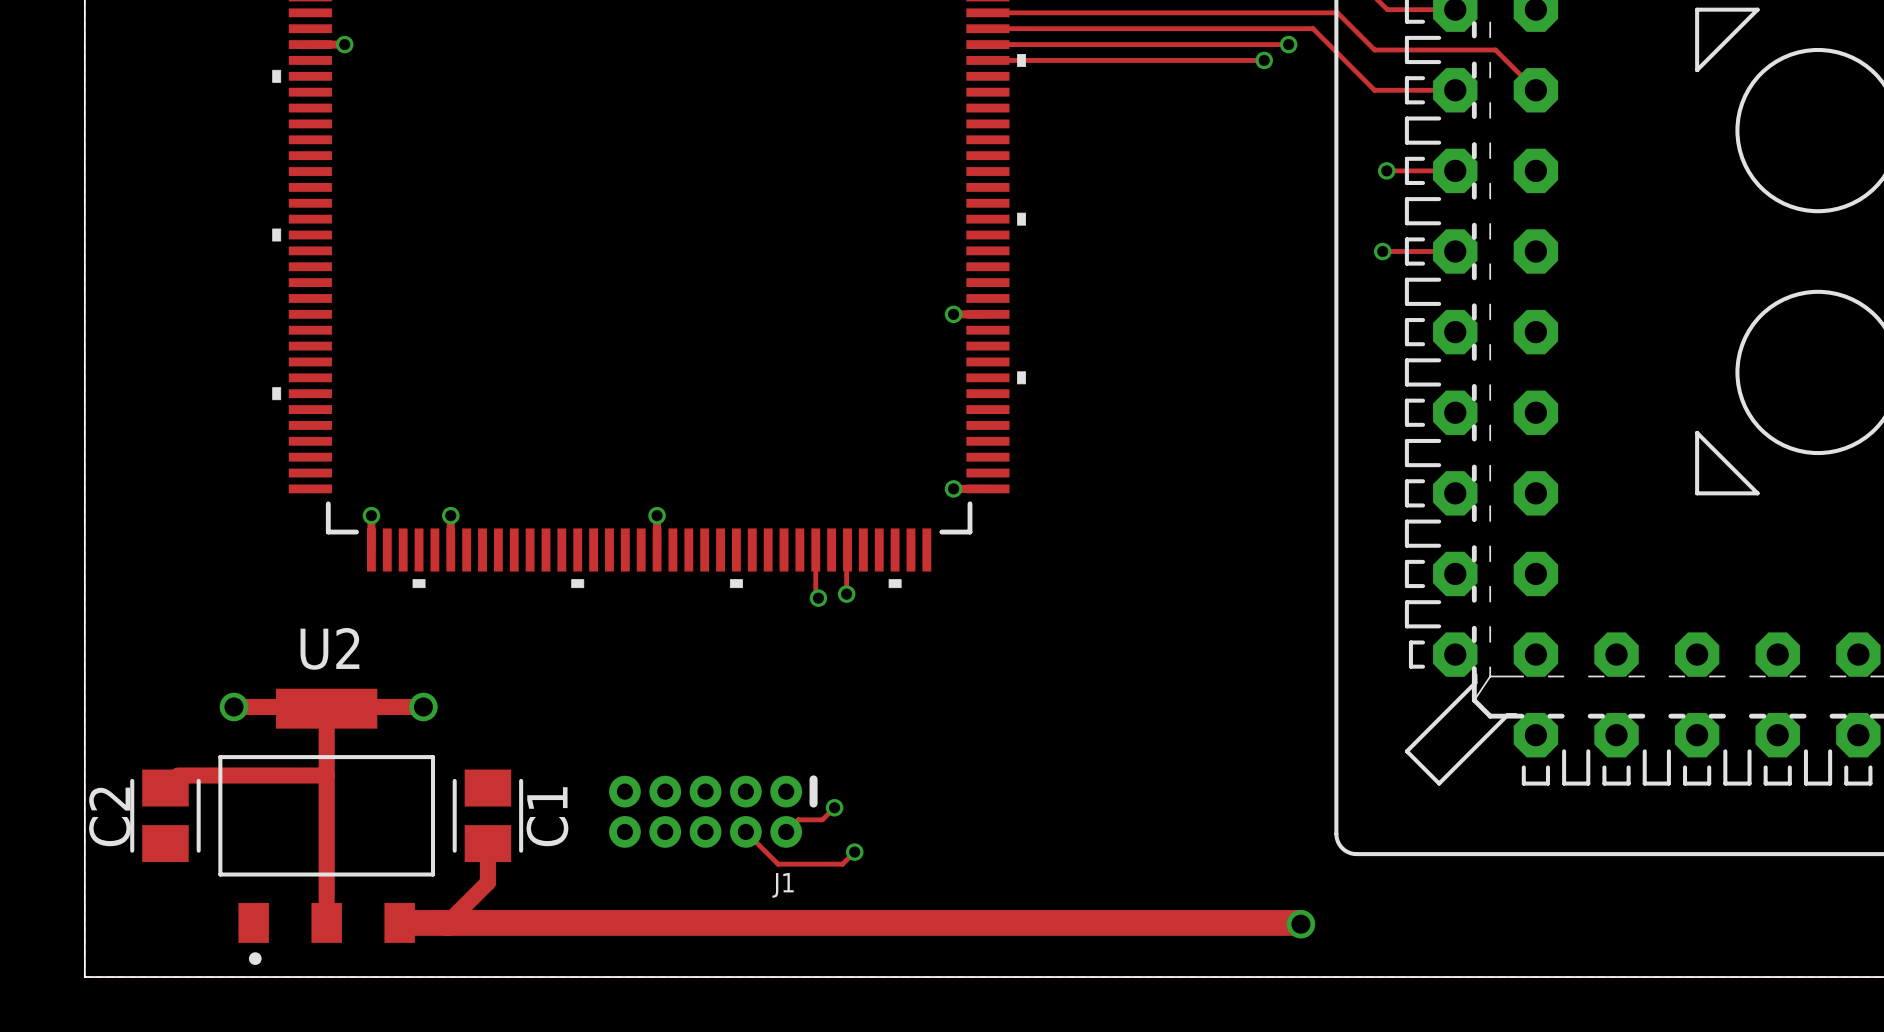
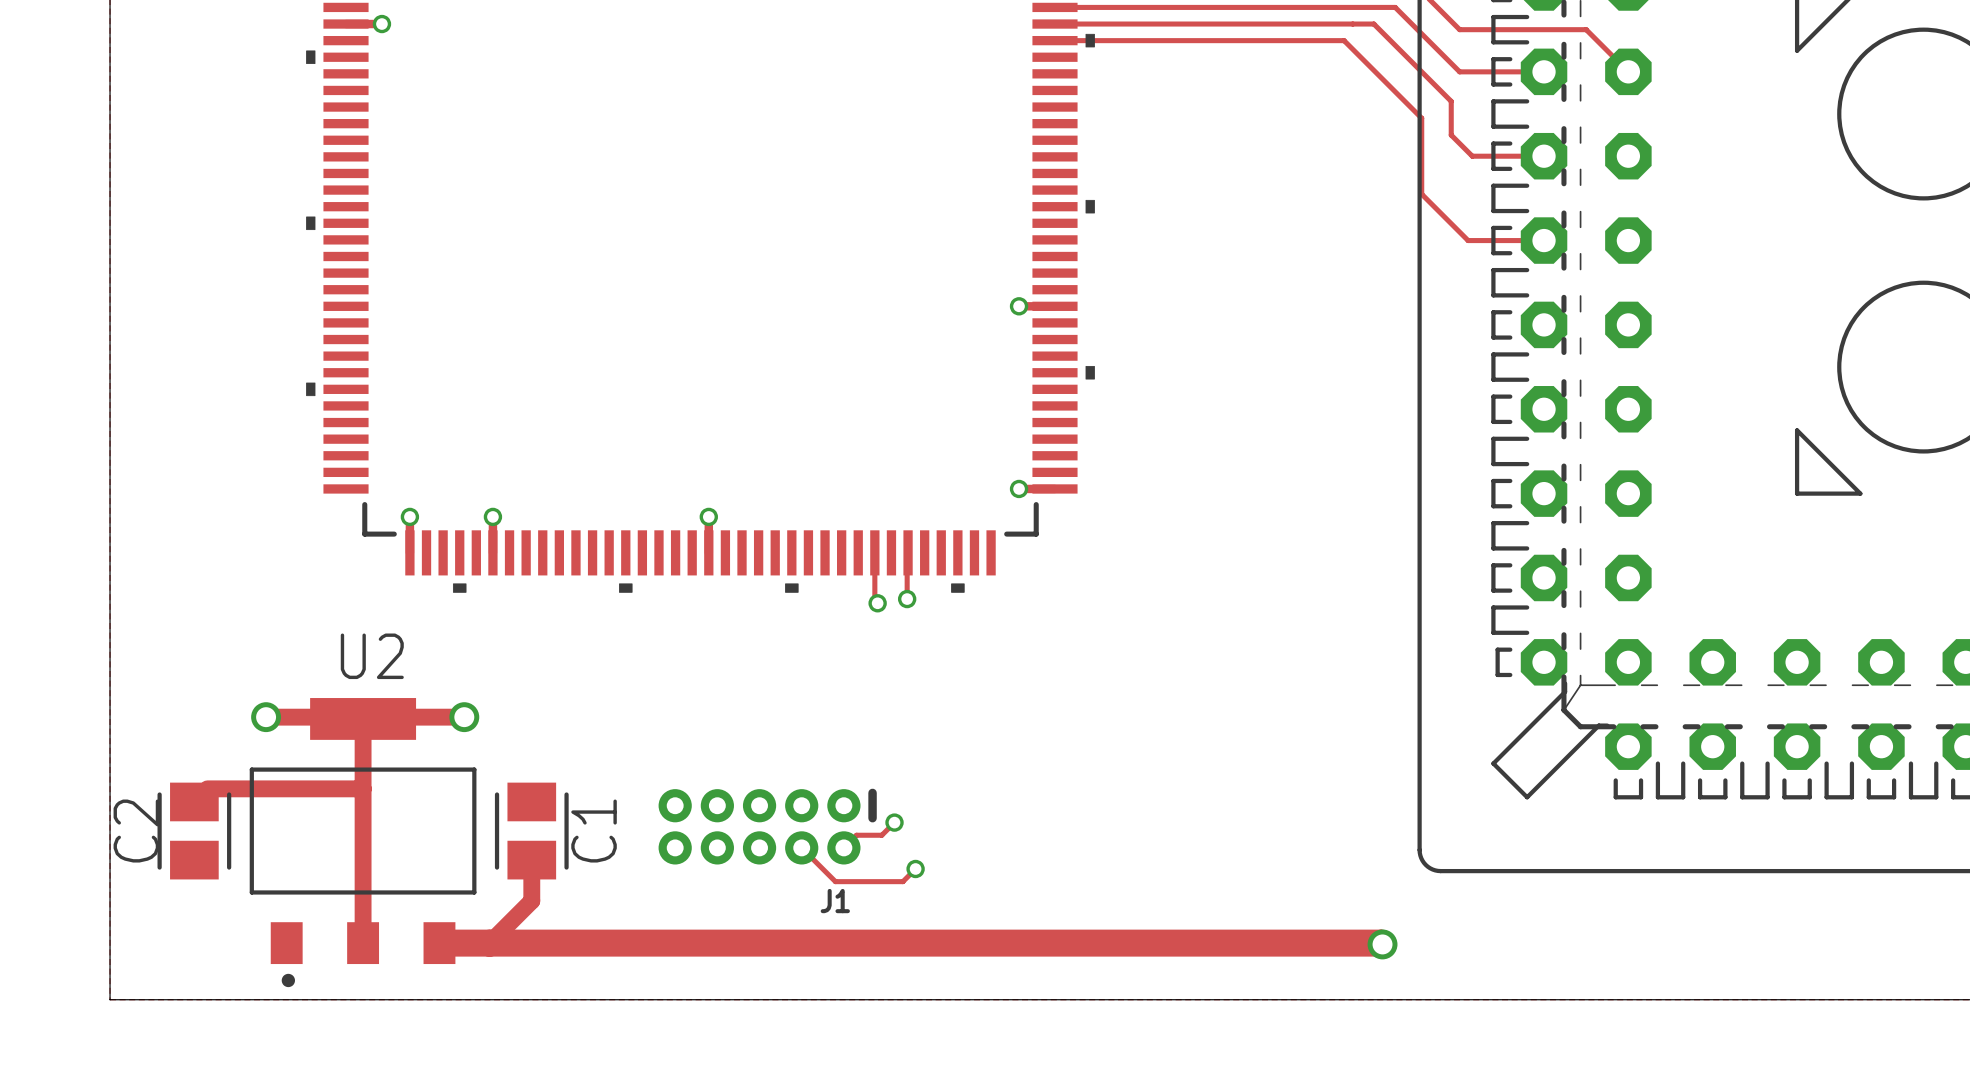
track: none -> (1369, 24) (1373, 24) (1451, 101) (1451, 135) (1472, 156)
via: (1288, 44) -> none
track: none -> (1344, 40) (1421, 118) (1421, 194) (1468, 240)
via: (1264, 60) -> none
via: (1386, 170) -> none
via: (1382, 251) -> none

